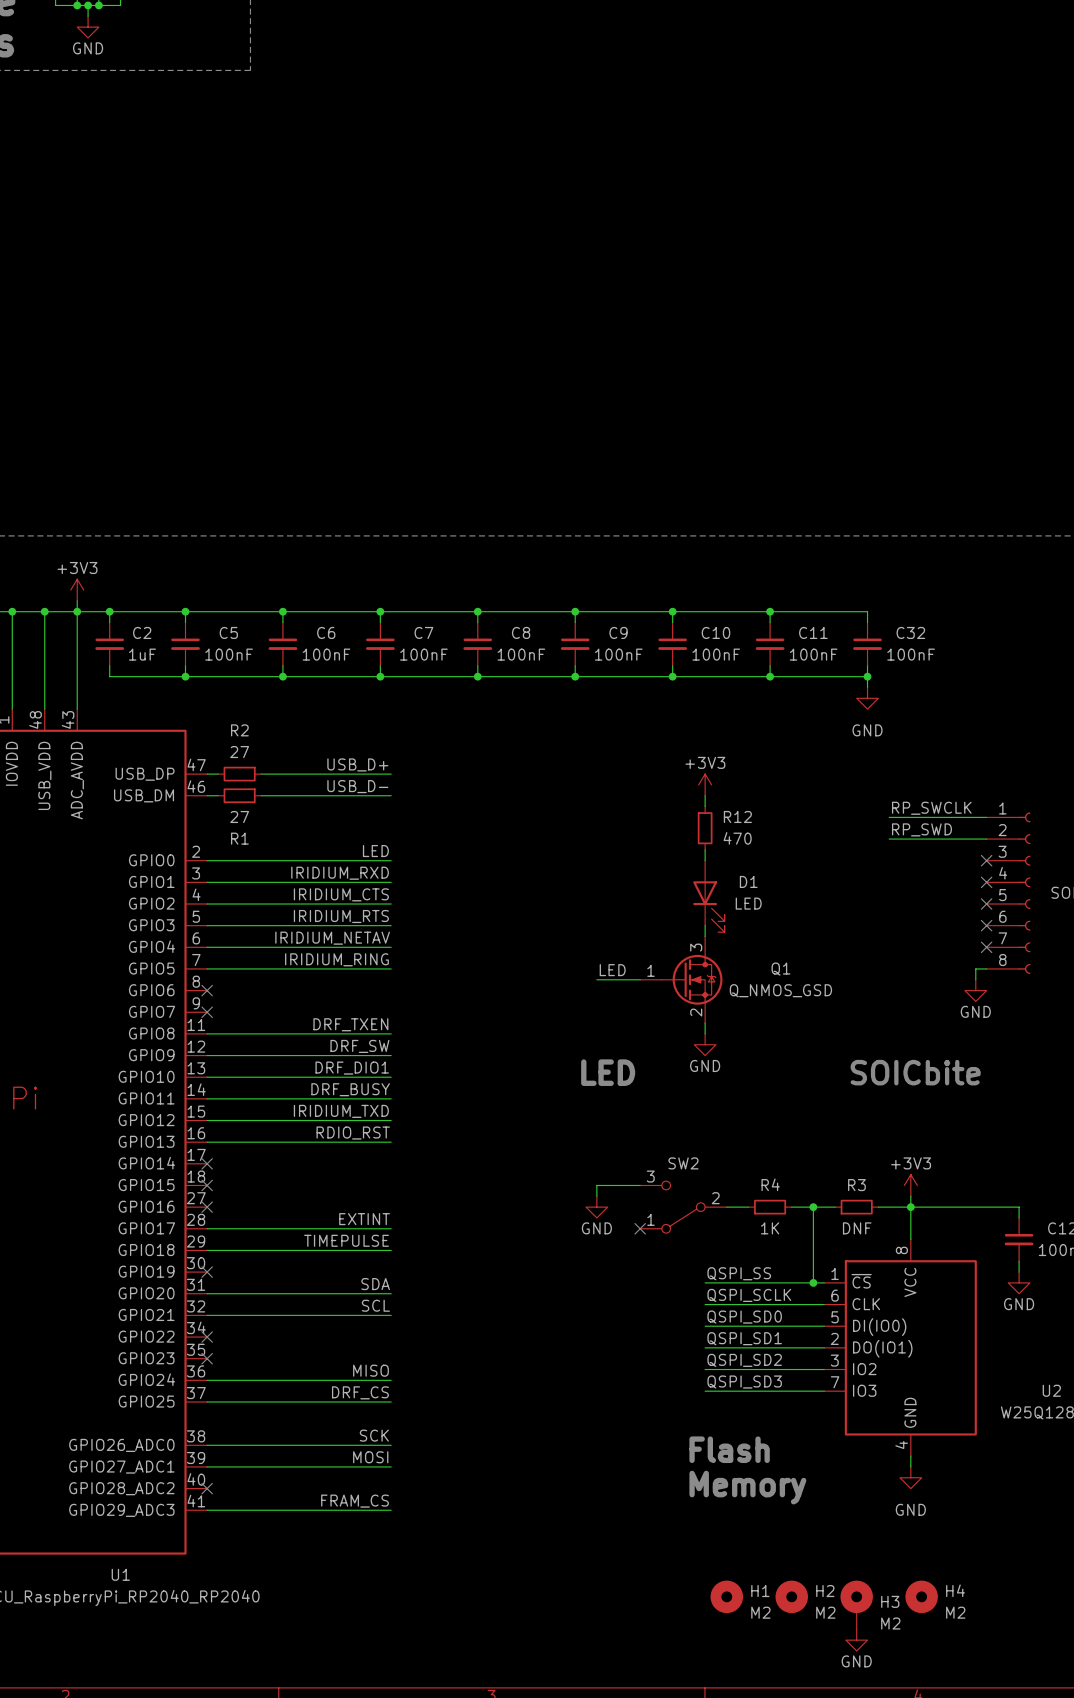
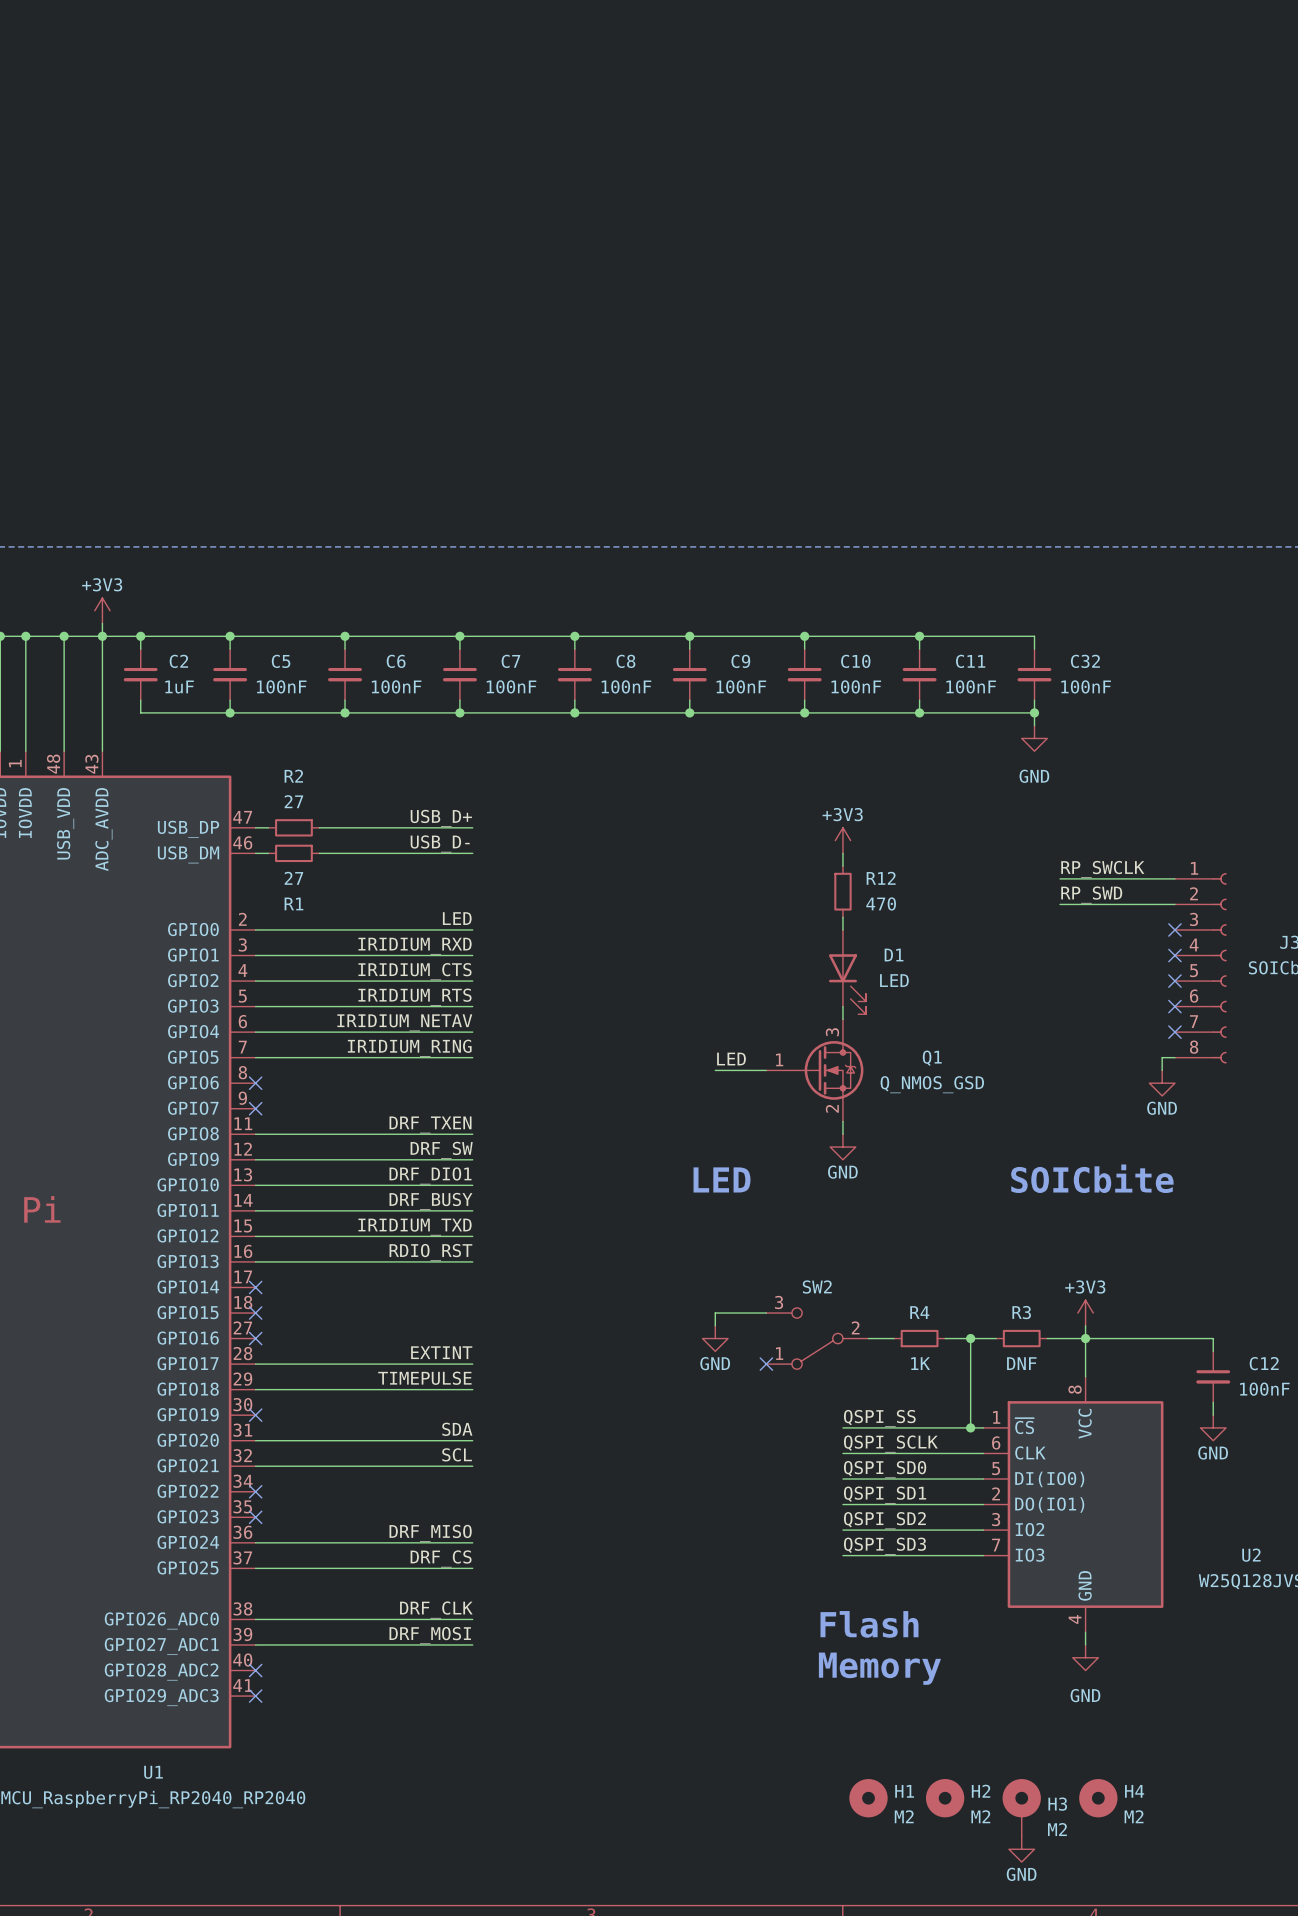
label: MISO (371, 1370) -> DRF_MISO (430, 1533)
label: SCK (374, 1435) -> DRF_CLK (436, 1610)
label: MOSI (370, 1457) -> DRF_MOSI (430, 1635)
label: FRAM_CS (355, 1501) -> none
wire: (207, 1510) (391, 1510) -> none
no-connect mark: none -> (255, 1696)

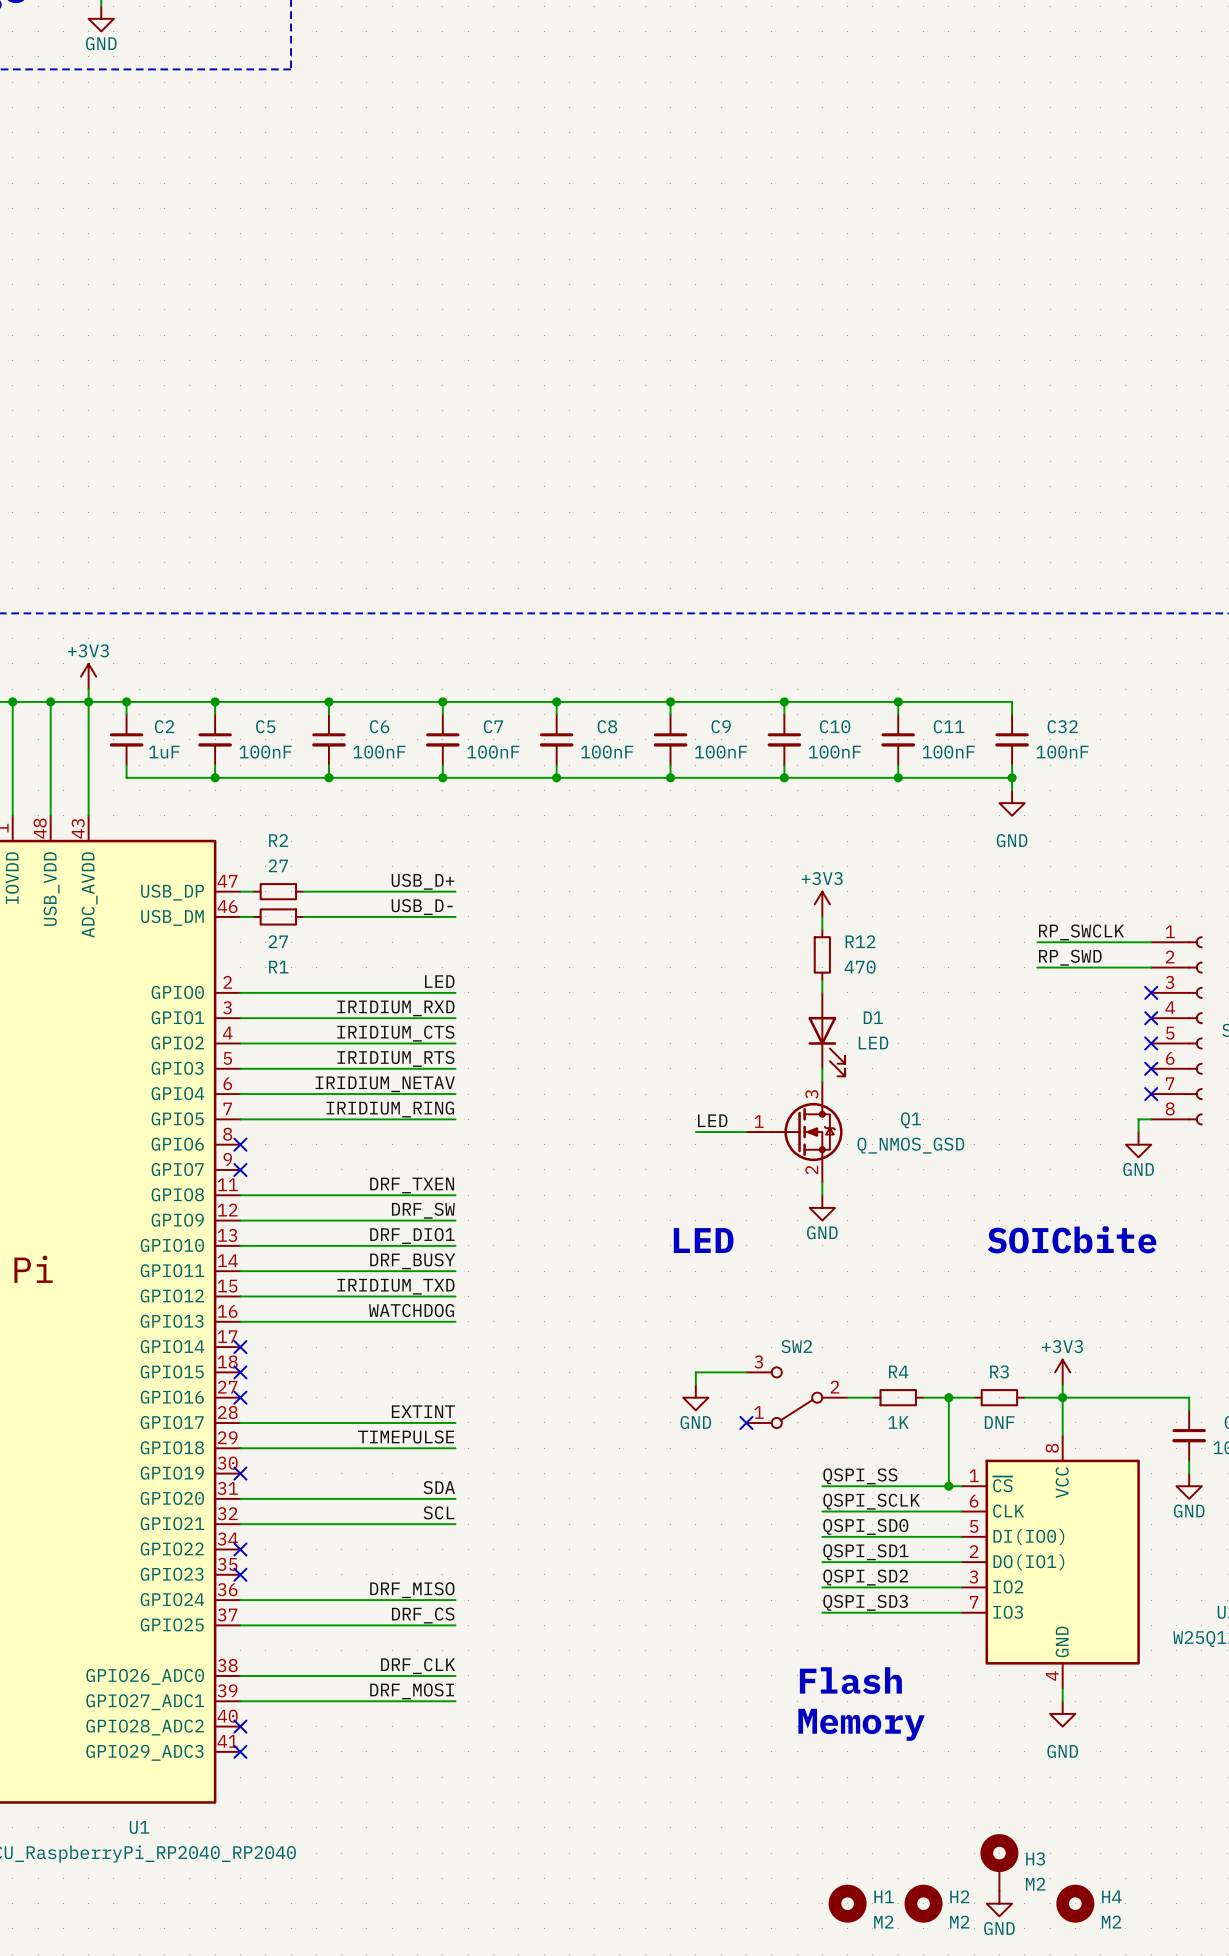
label: RDIO_RST (430, 1252) -> WATCHDOG (411, 1310)
H1 position: (868, 1798) -> (847, 1903)
H2 position: (945, 1798) -> (923, 1903)
H4 position: (1098, 1798) -> (1075, 1903)

